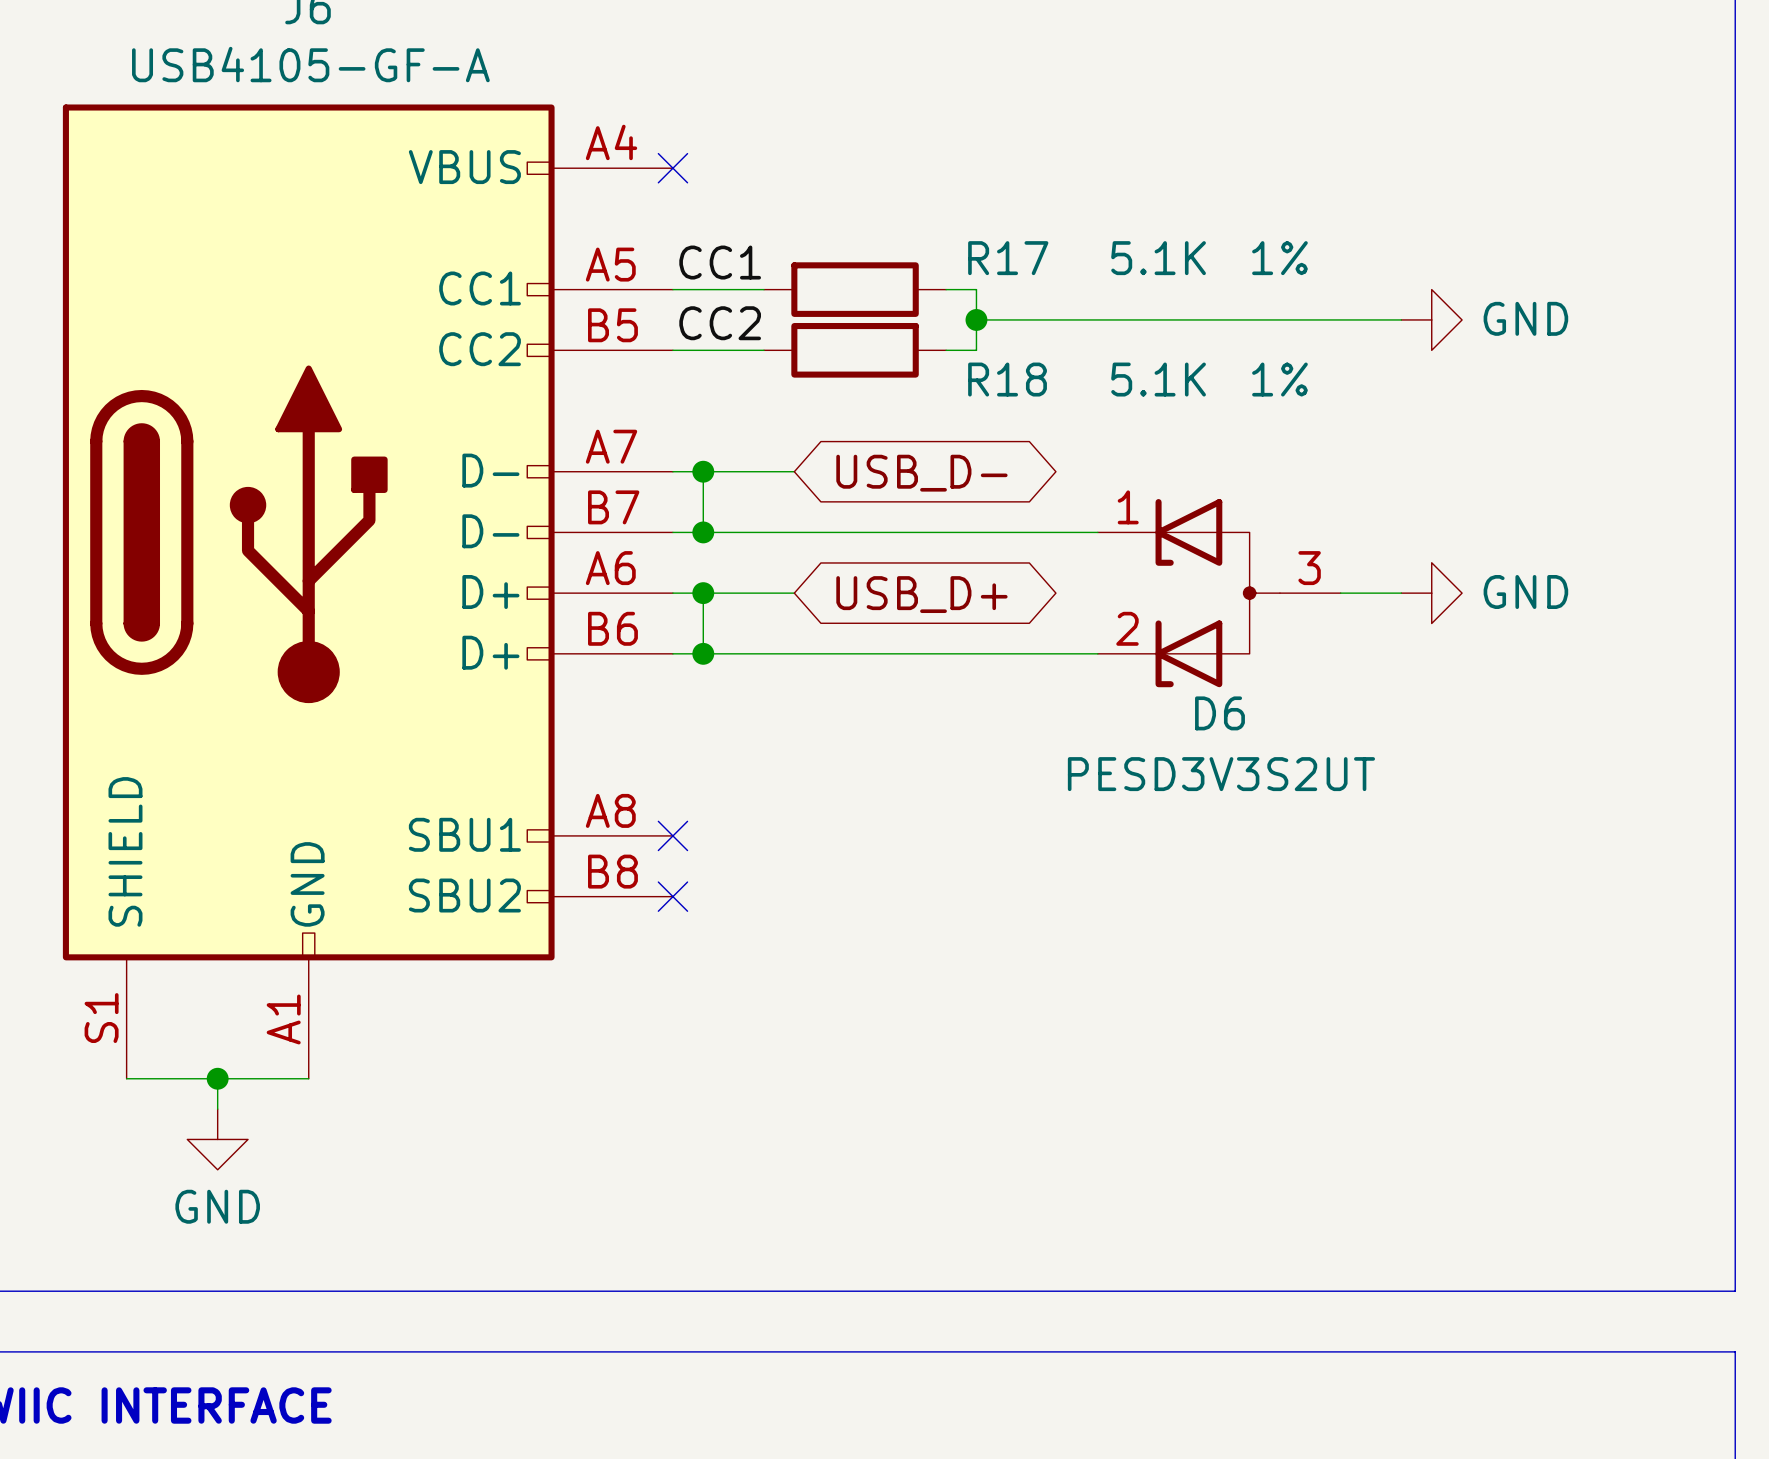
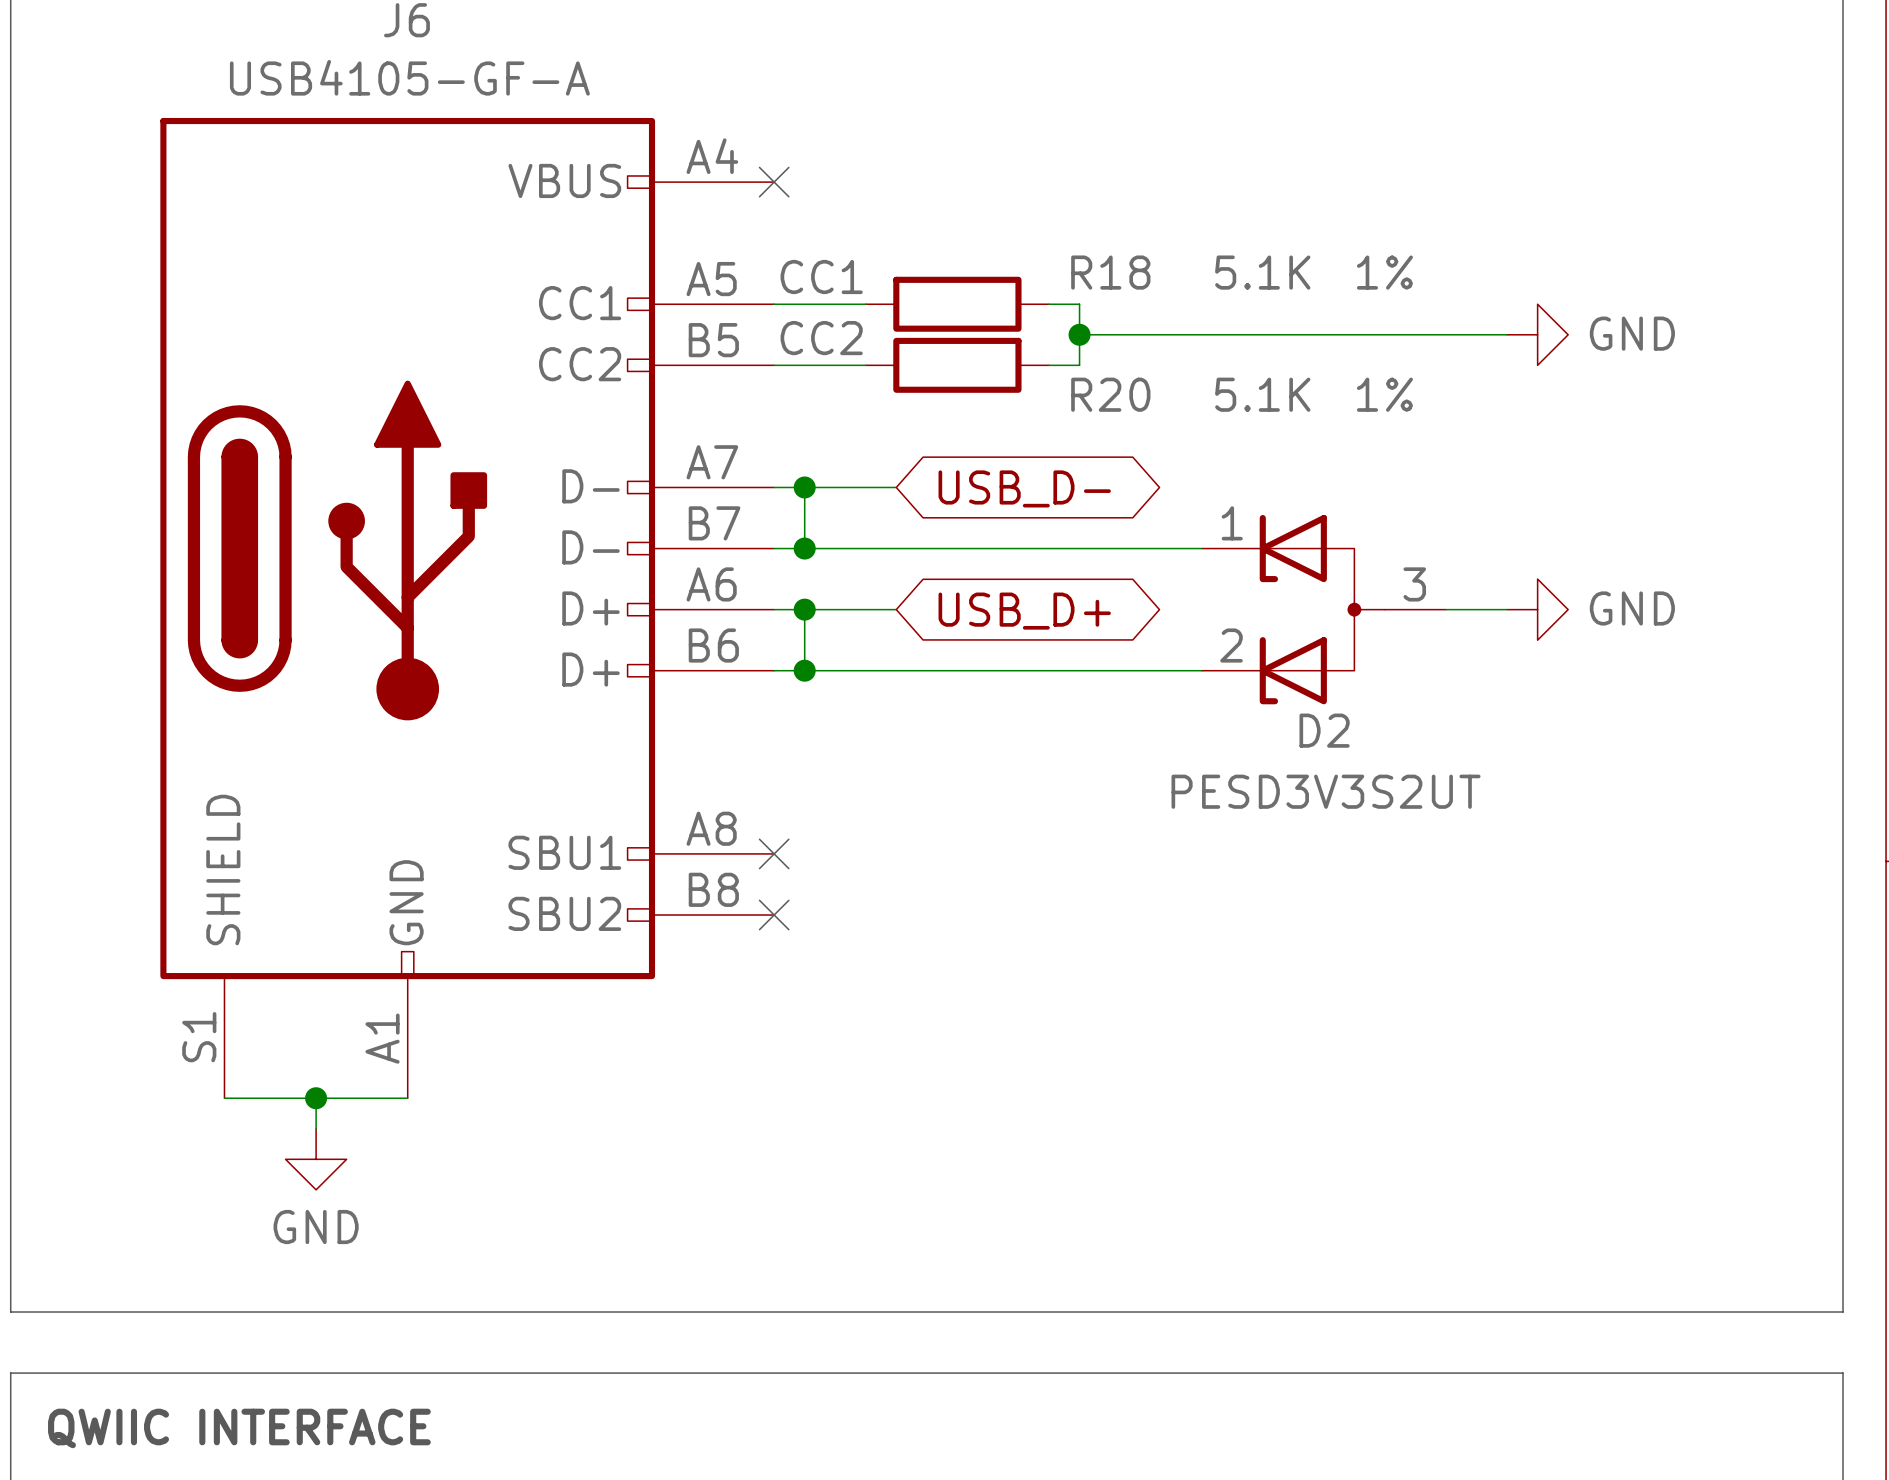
R17 name: R17 (1008, 258) -> R18 (1110, 272)
R18 name: R18 (1007, 379) -> R20 (1110, 394)
D6 name: D6 (1219, 713) -> D2 (1324, 730)

